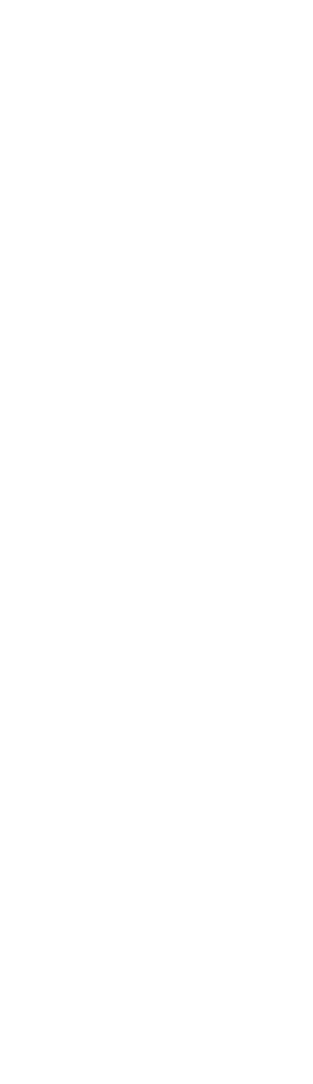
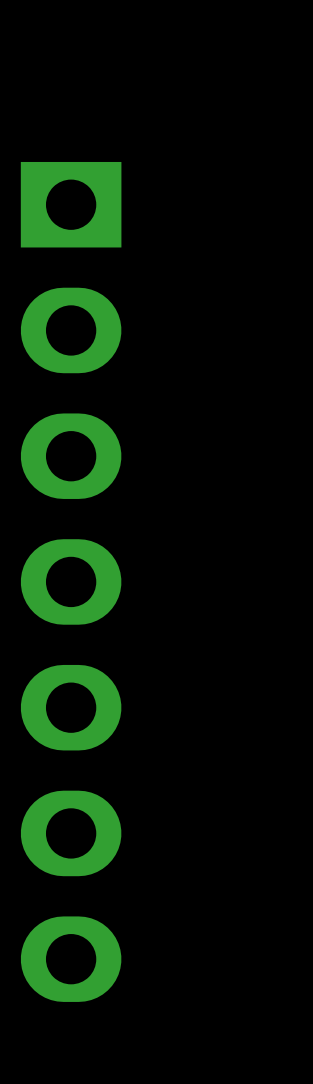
part: none -> (71, 581)

